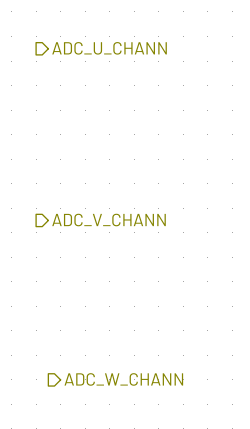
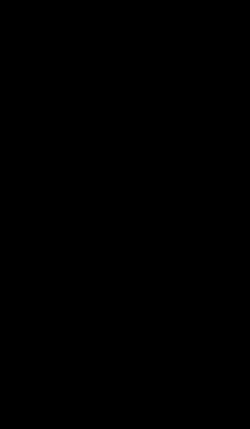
hierarchical label: ADC_U_CHANN (109, 48) -> none
hierarchical label: ADC_V_CHANN (109, 220) -> none
hierarchical label: ADC_W_CHANN (123, 379) -> none

